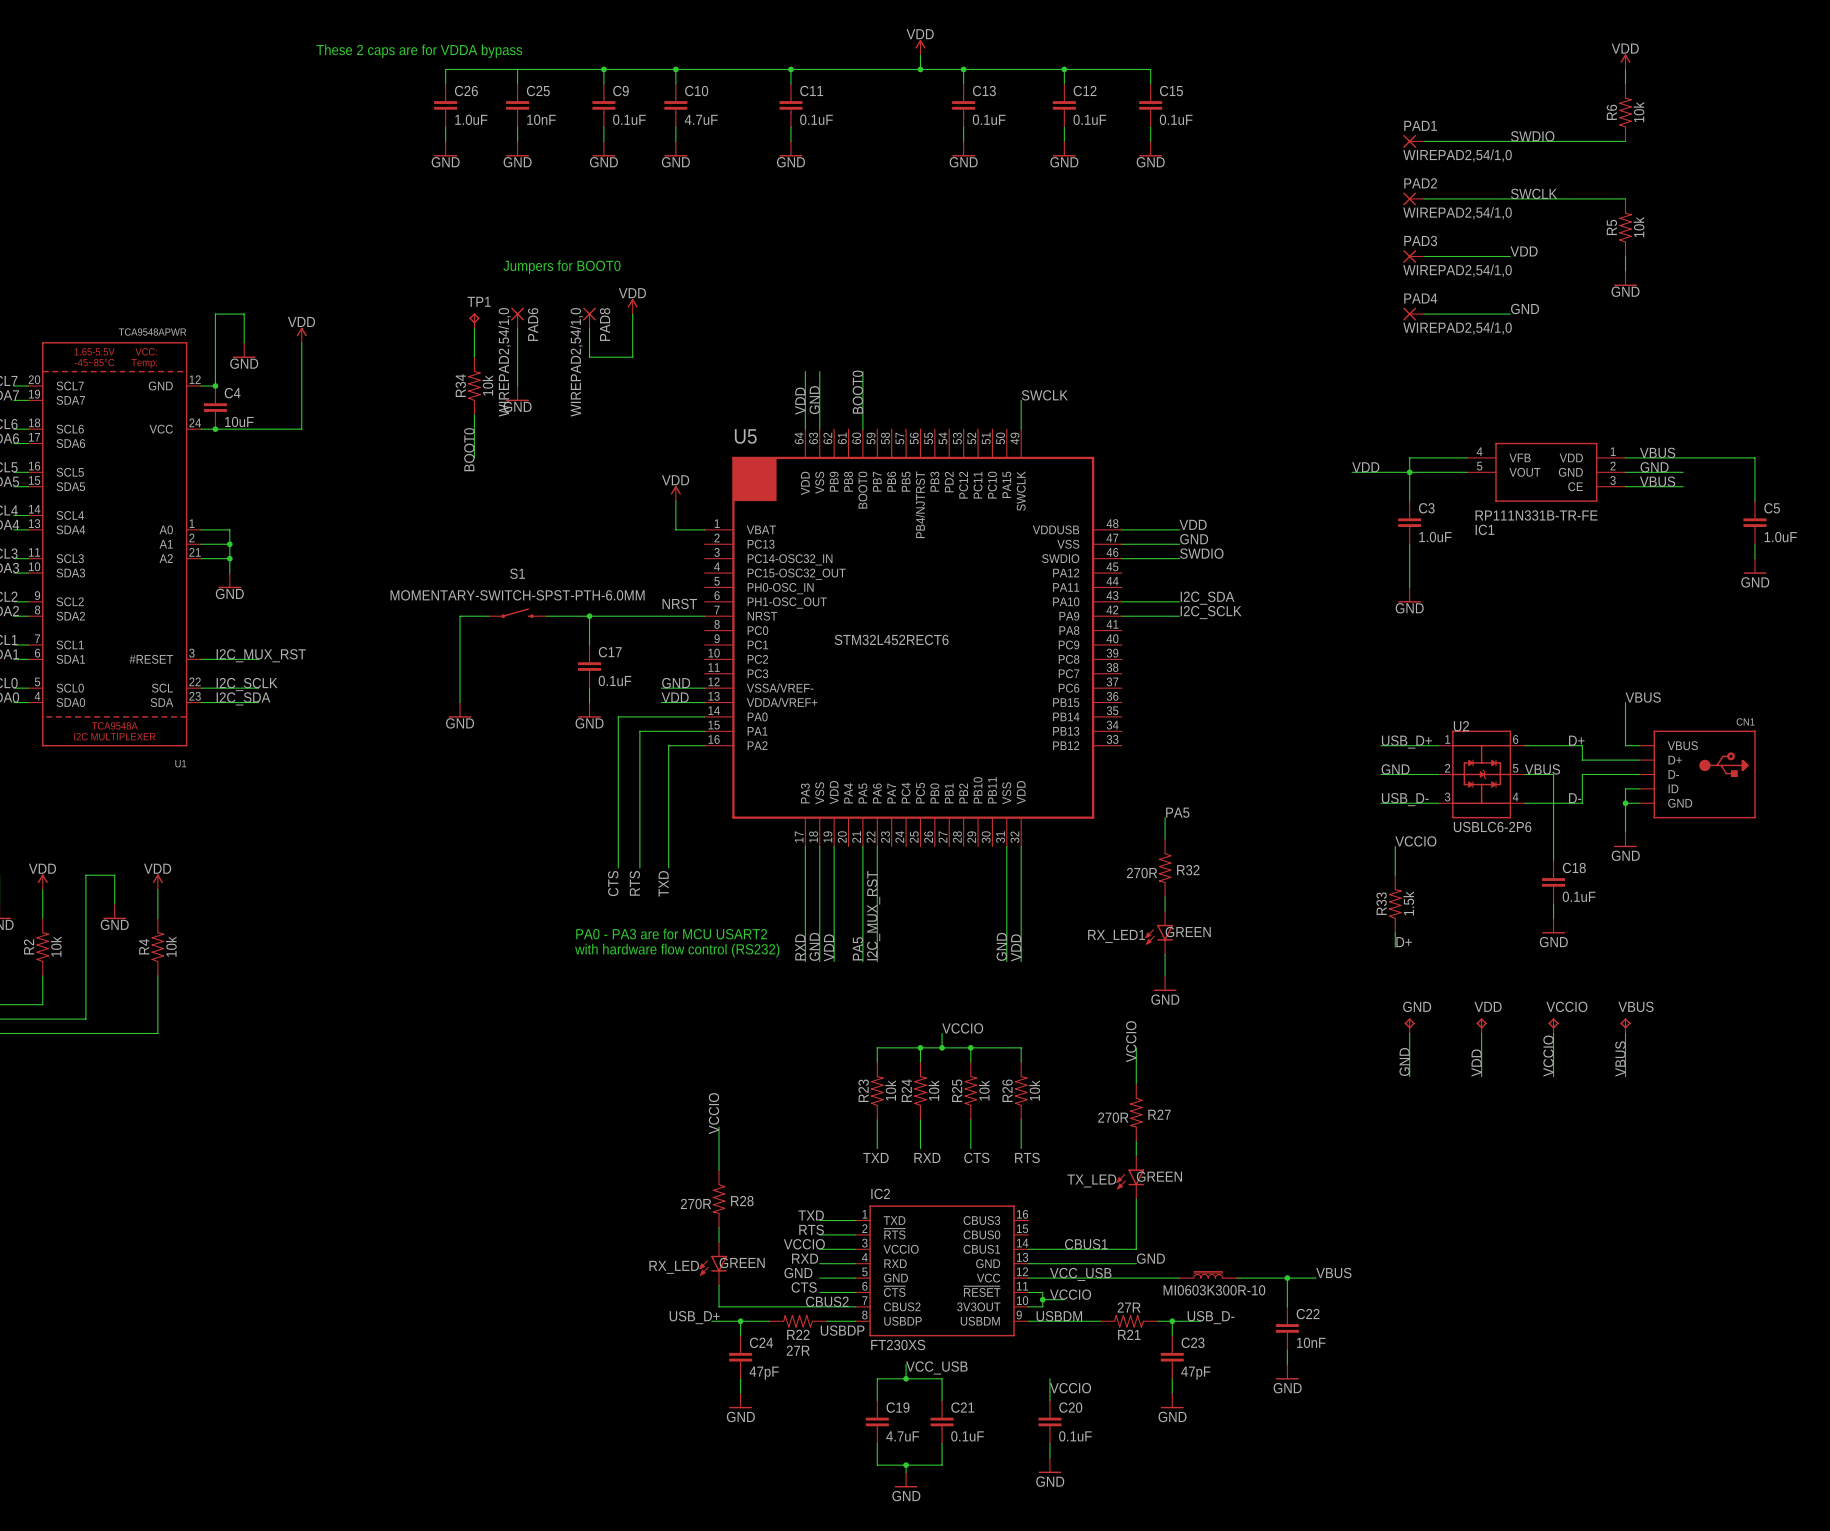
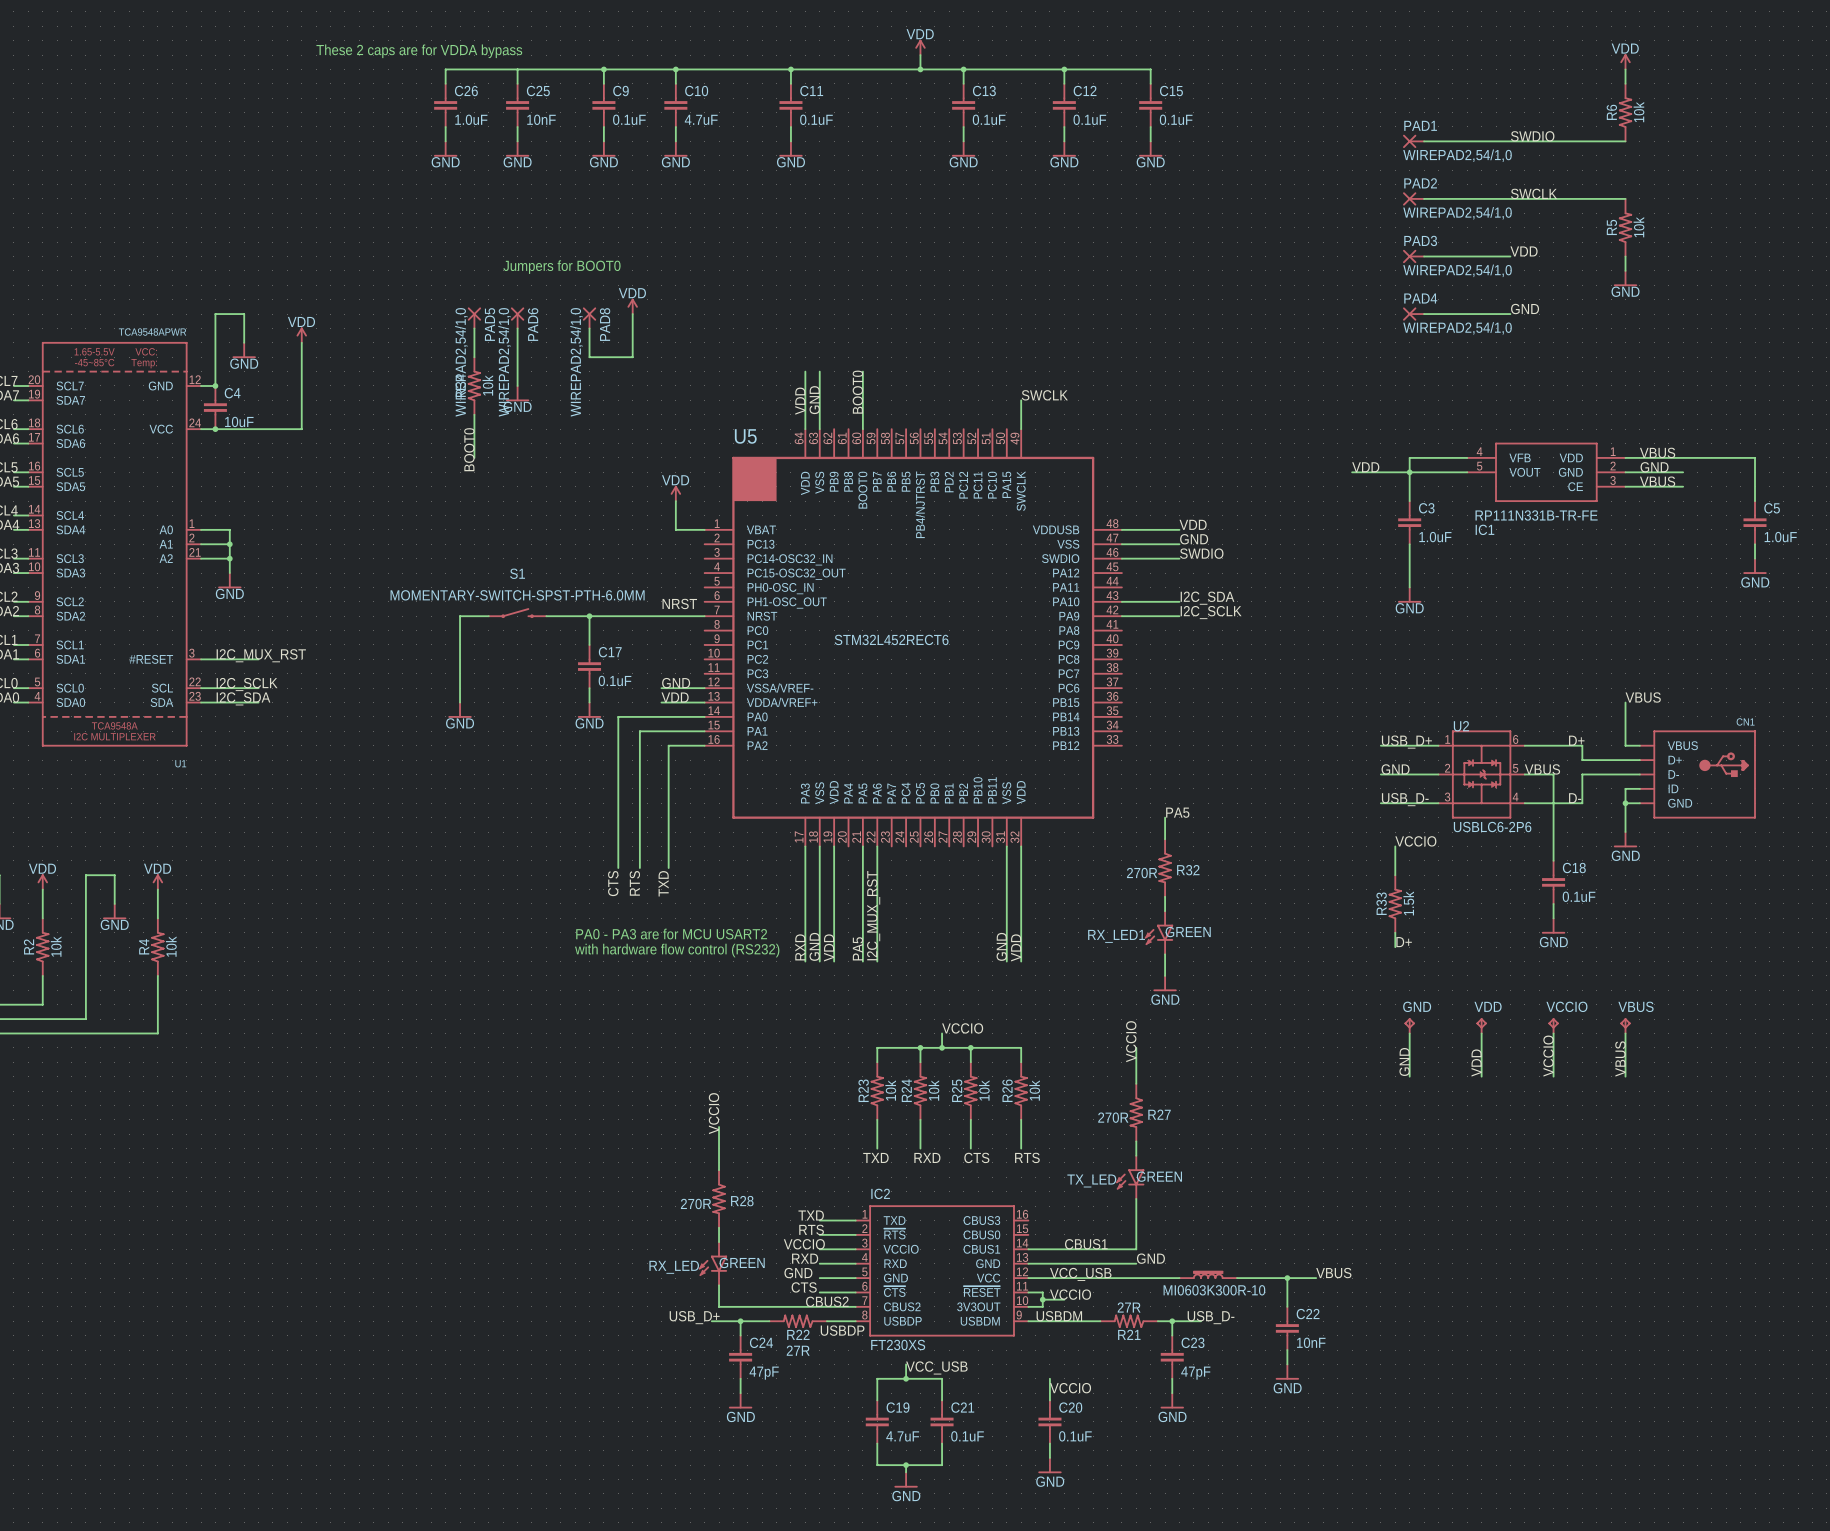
PAD5: none -> WIREPAD2,54/1,0 (474, 318)
TP1: (474, 320) -> none

